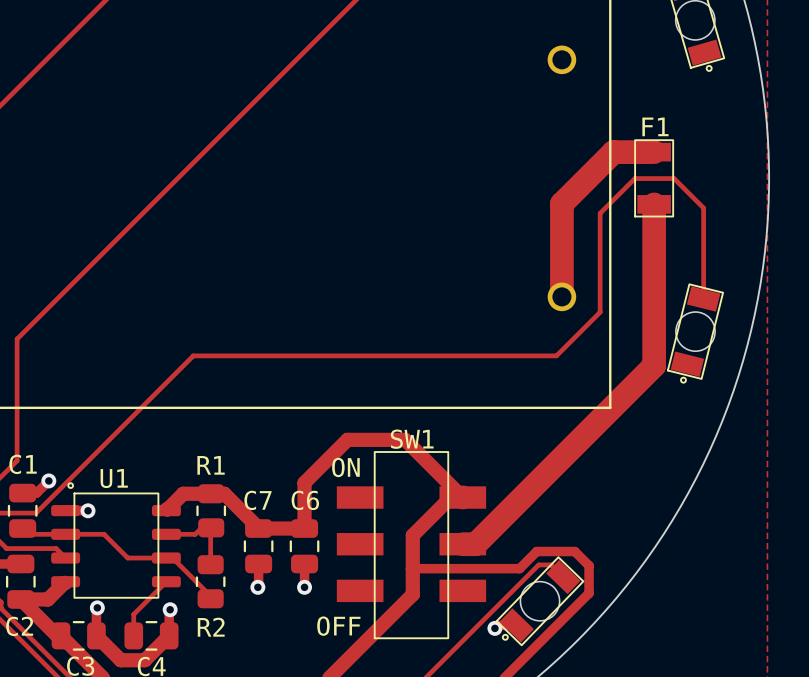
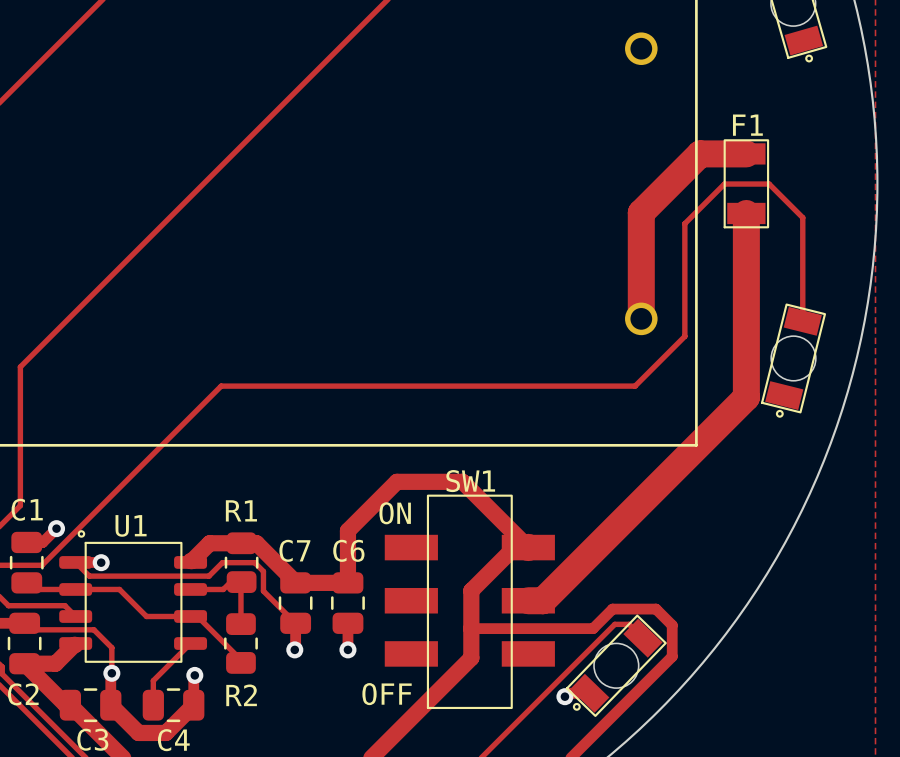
track: none -> (75, 562) (89, 576) (208, 576) (222, 562) (254, 562) (263, 571) (263, 591) (295, 623)
track: none -> (31, 629) (93, 629) (111, 647) (111, 673)

